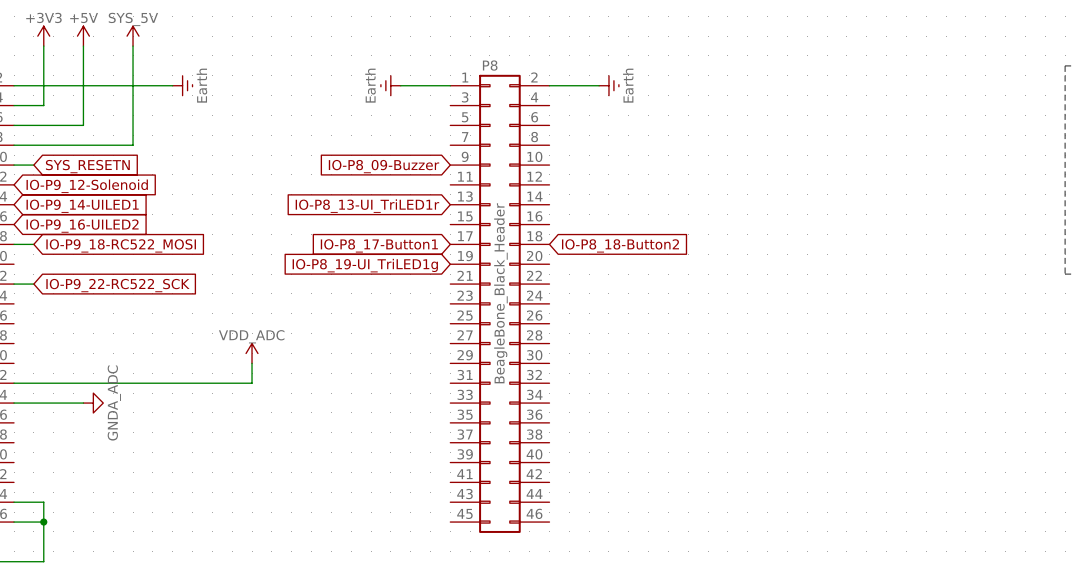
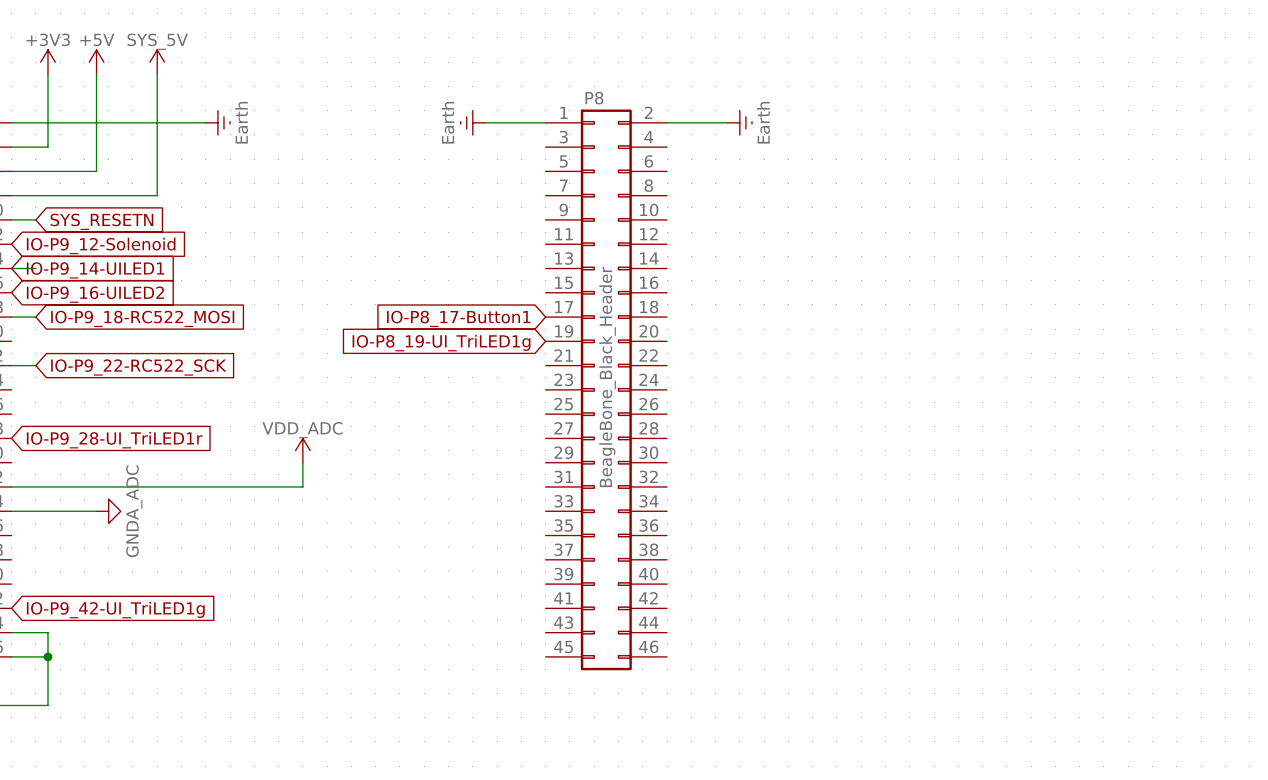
global label: IO-P8_09-Buzzer (384, 166) -> none
wire: none -> (11, 268) (35, 268)
global label: IO-P8_13-UI_TriLED1r (367, 206) -> none
global label: IO-P8_18-Button2 (620, 245) -> none
global label: none -> IO-P9_28-UI_TriLED1r (114, 440)
global label: none -> IO-P9_42-UI_TriLED1g (115, 610)

